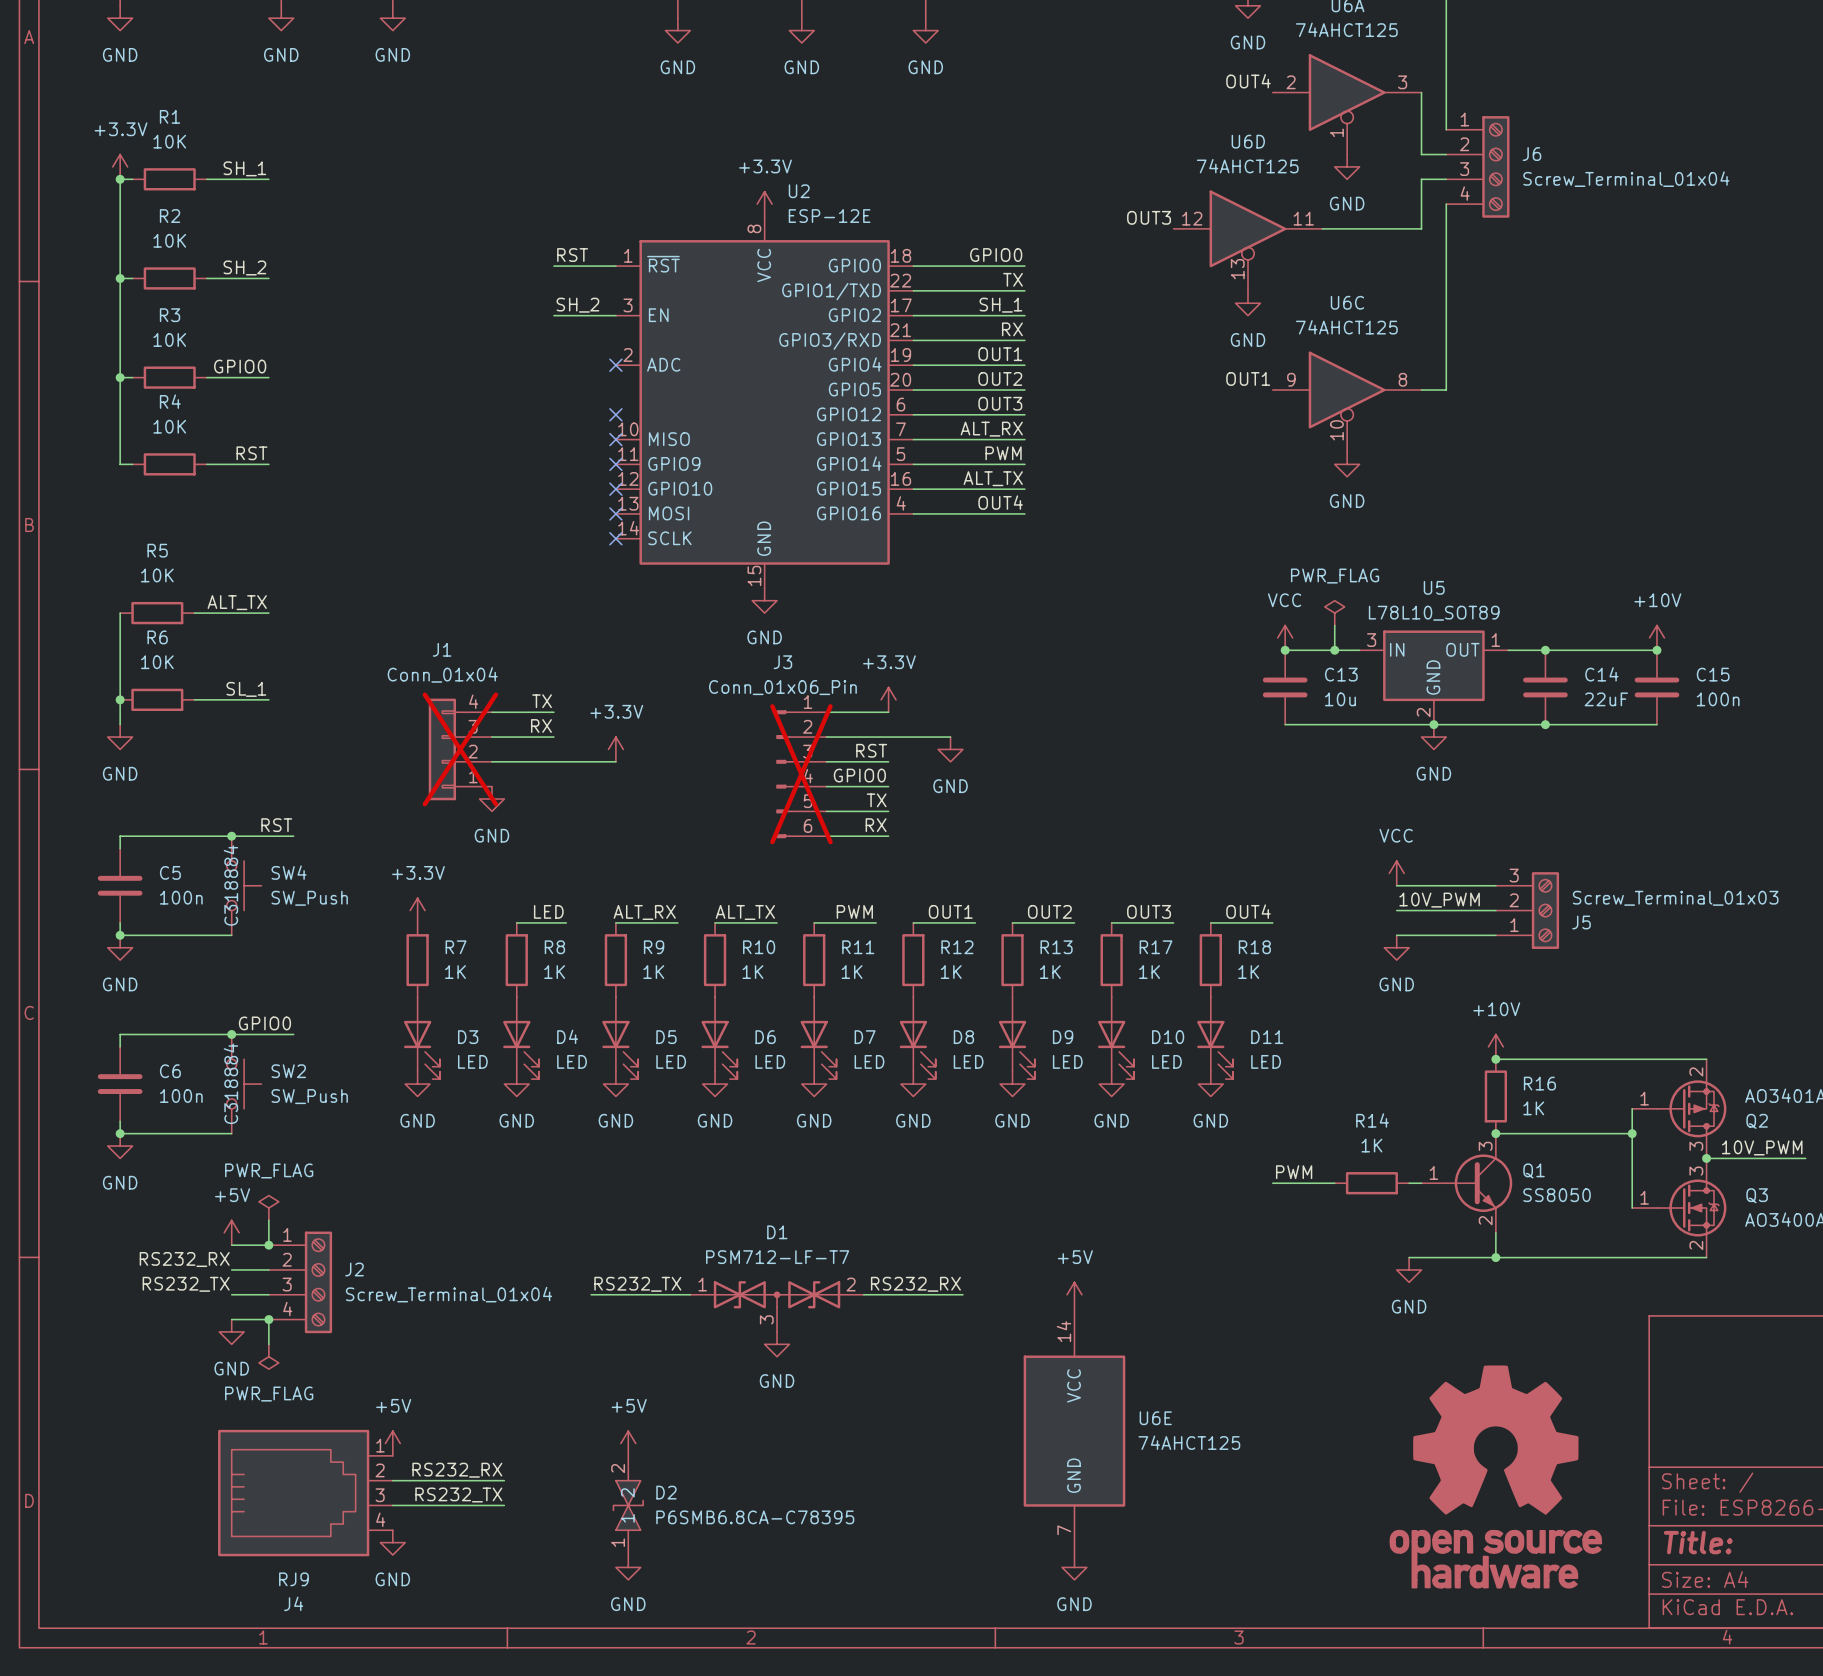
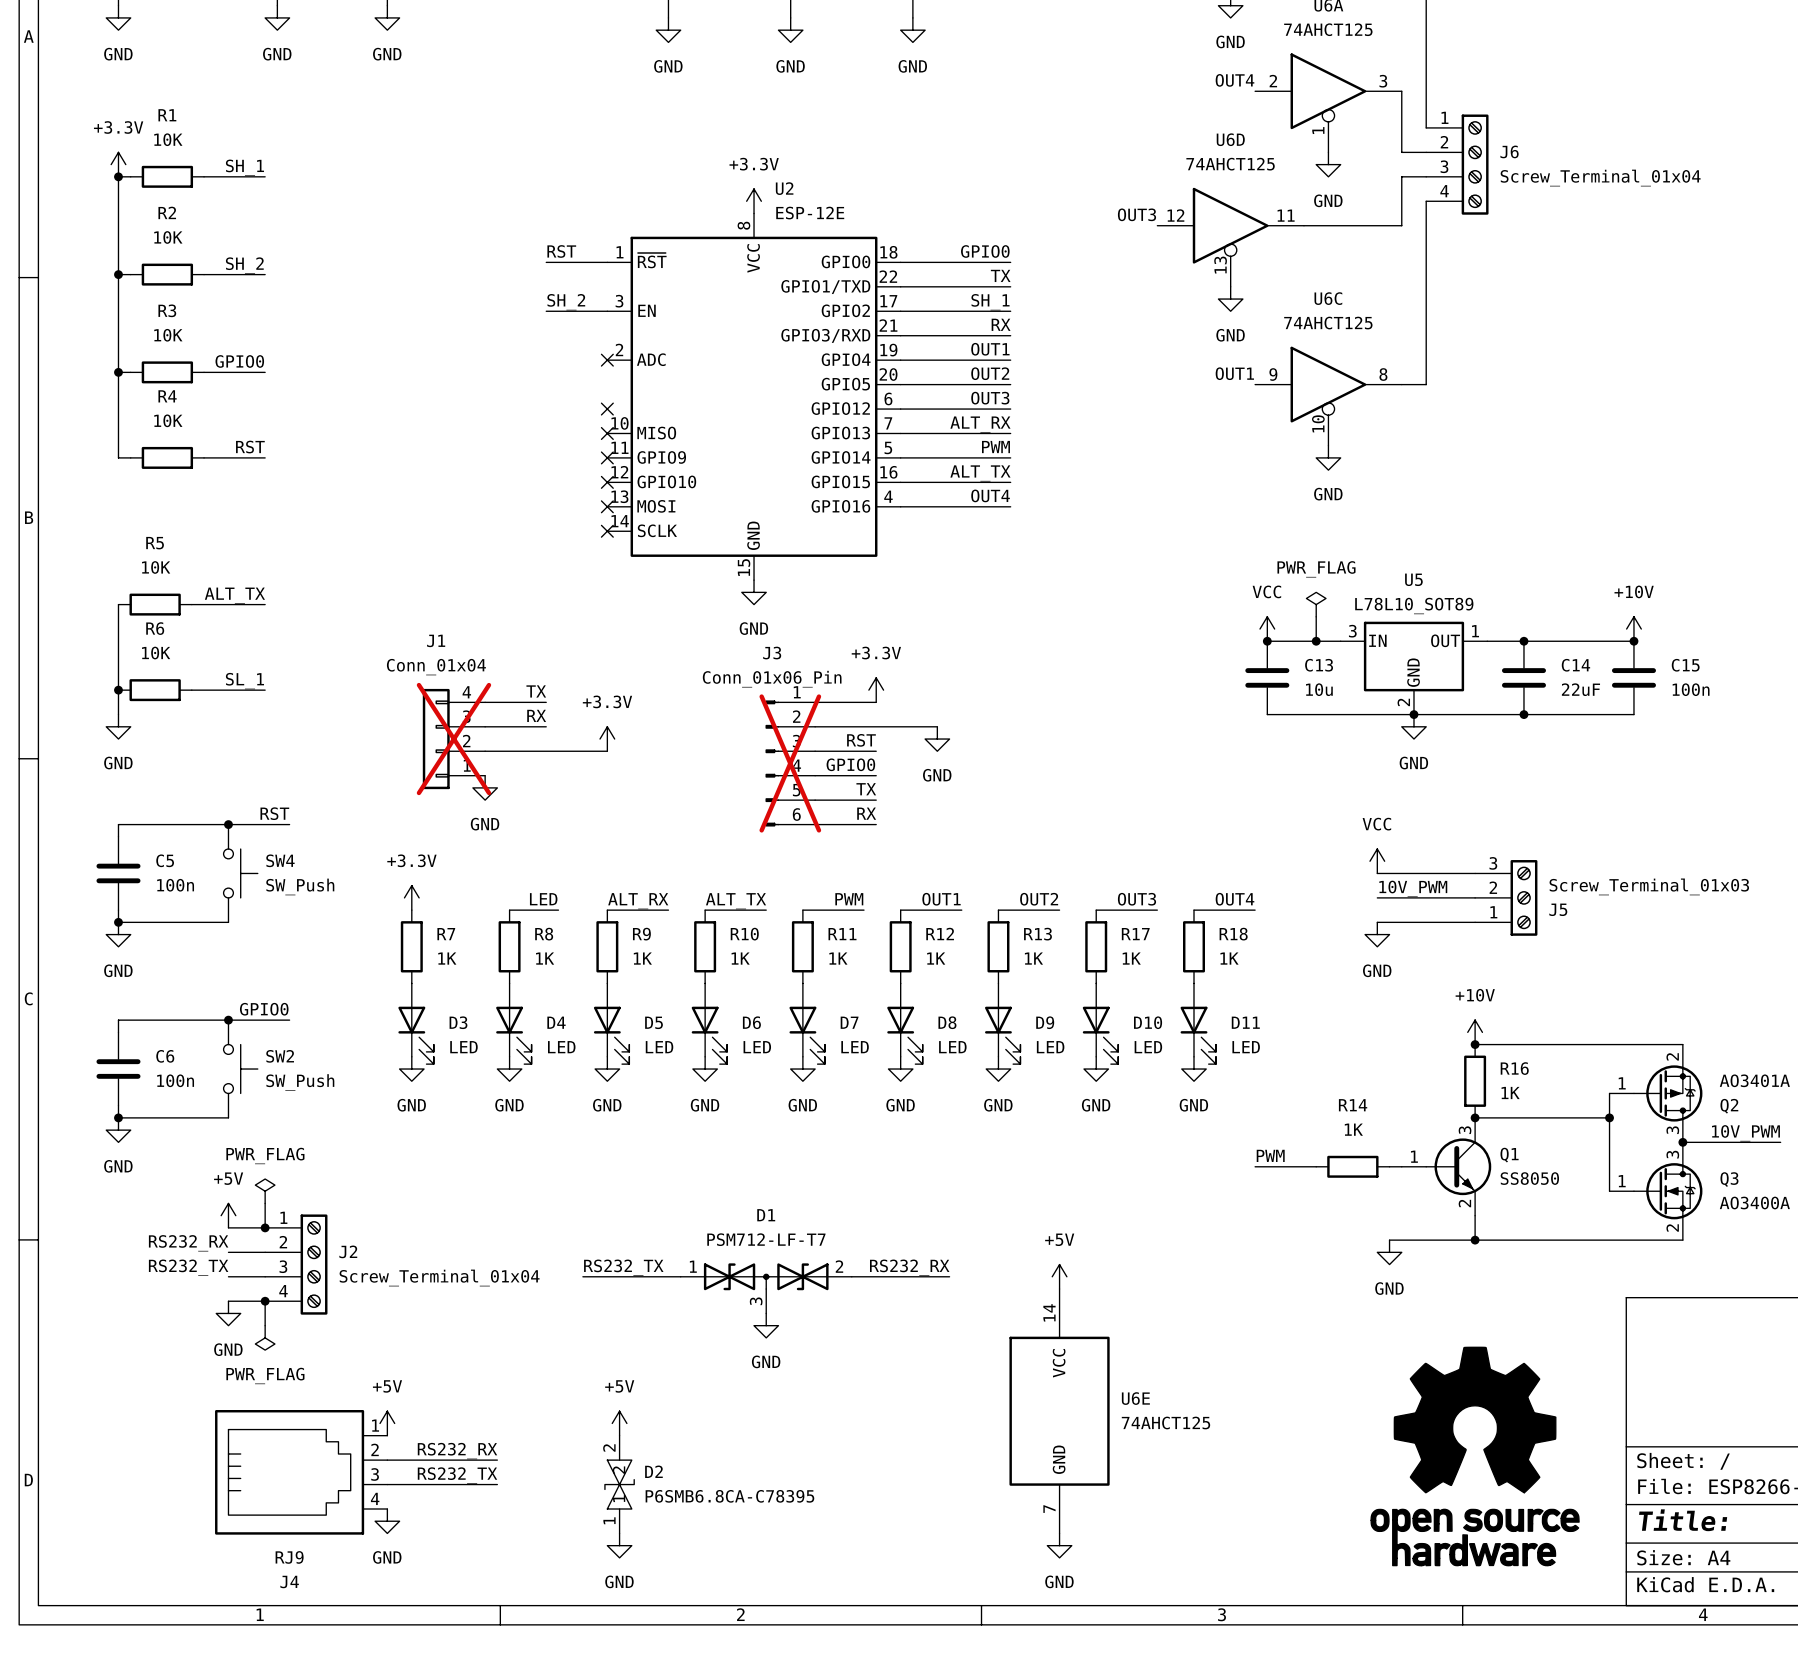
SW4 text: C318884 (230, 885) -> none
SW2 text: C318884 (230, 1083) -> none

